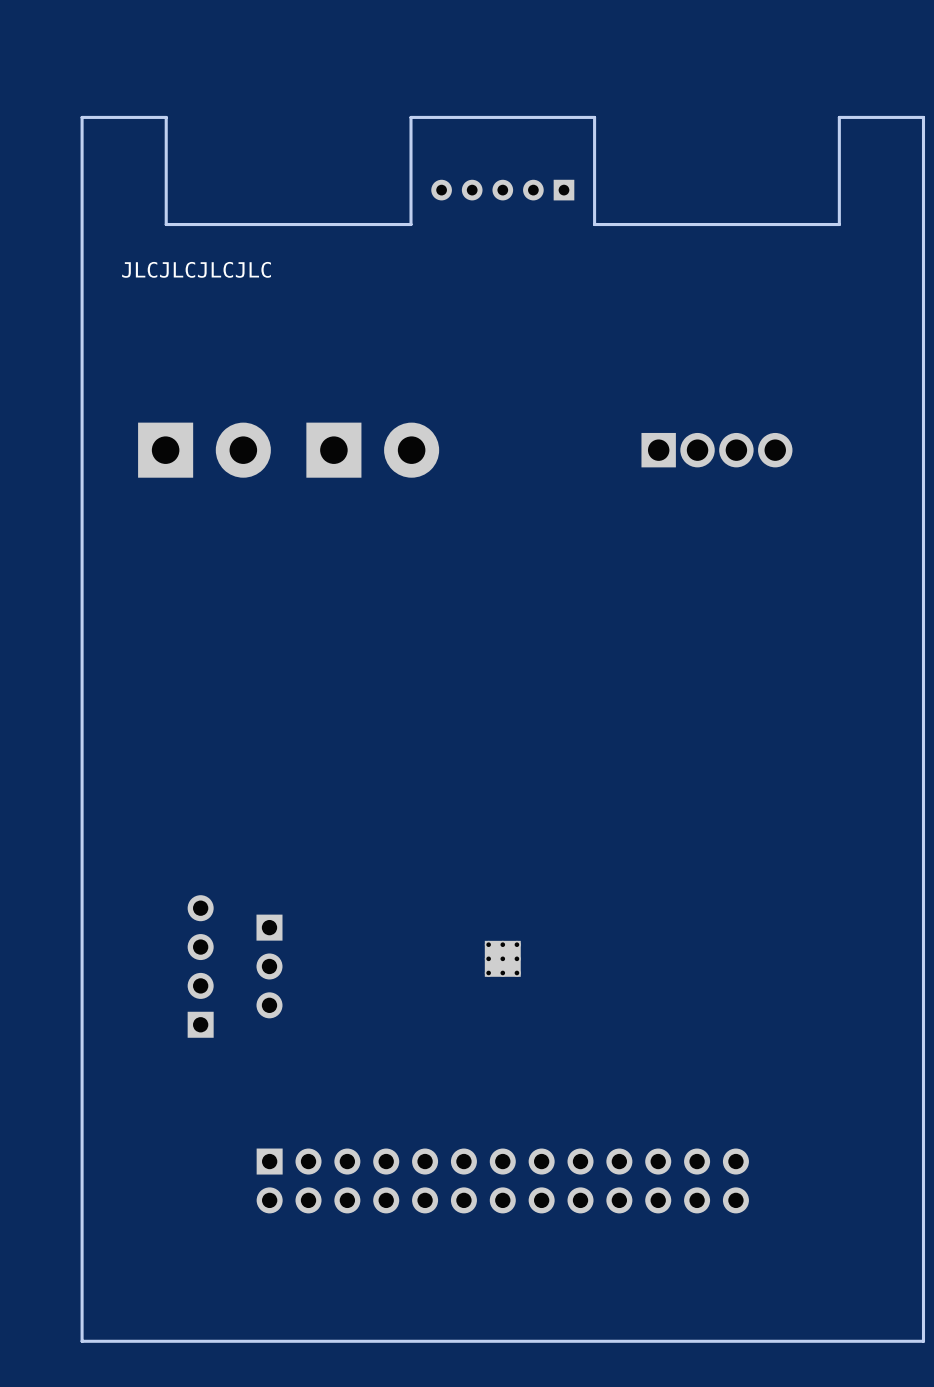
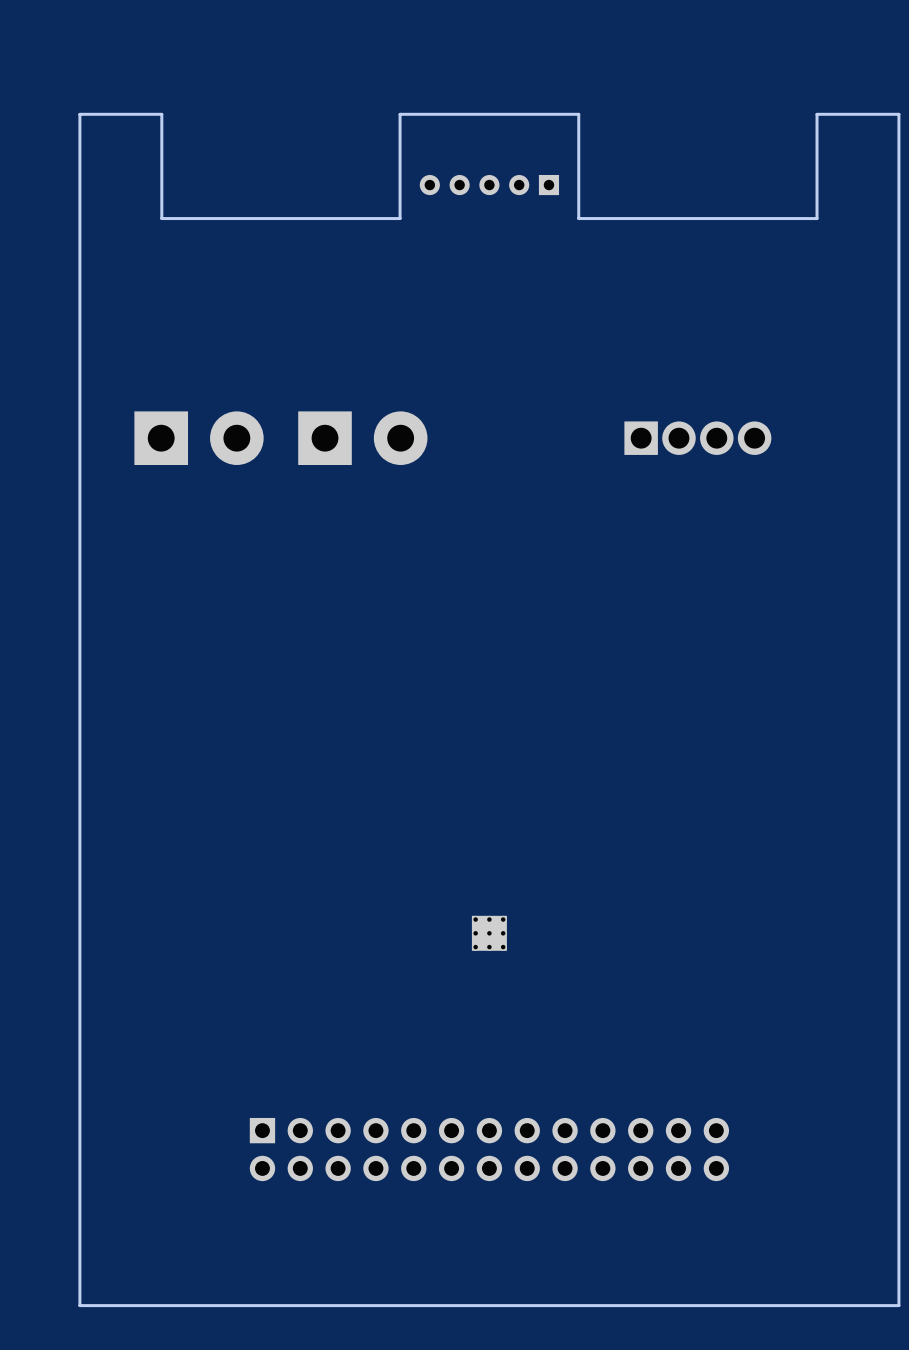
text: JLCJLCJLCJLC (196, 269) -> none
part: (200, 966) -> none
part: (269, 966) -> none

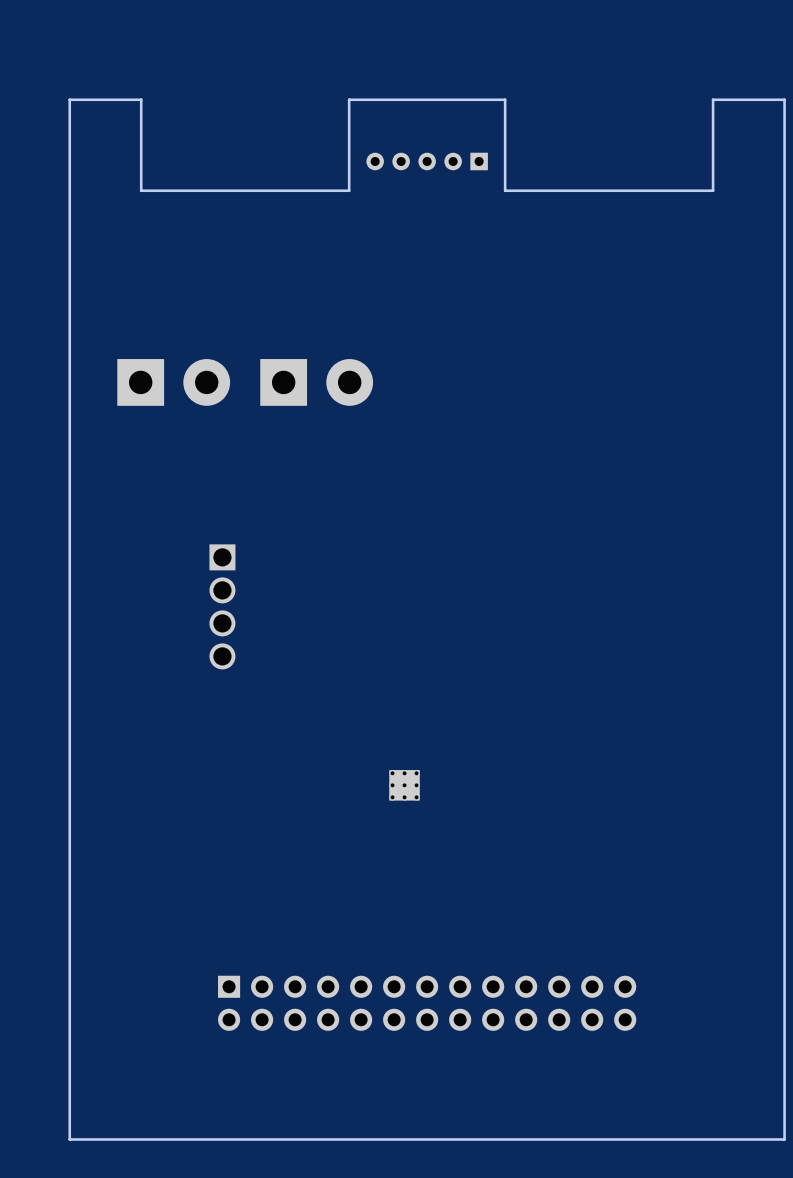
part: (697, 438) -> none
part: none -> (222, 606)
part position: (489, 933) -> (404, 785)

